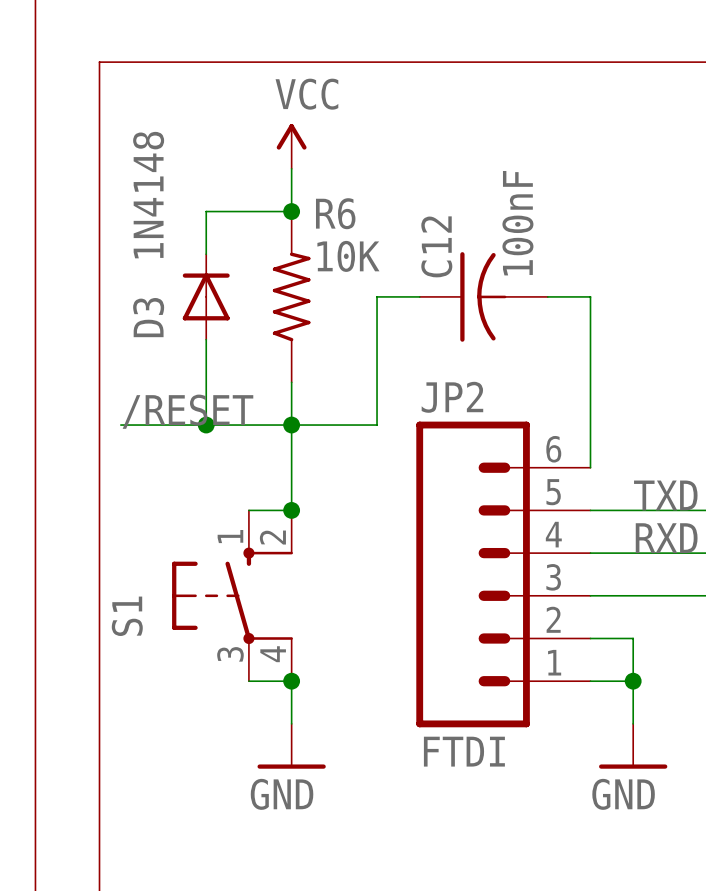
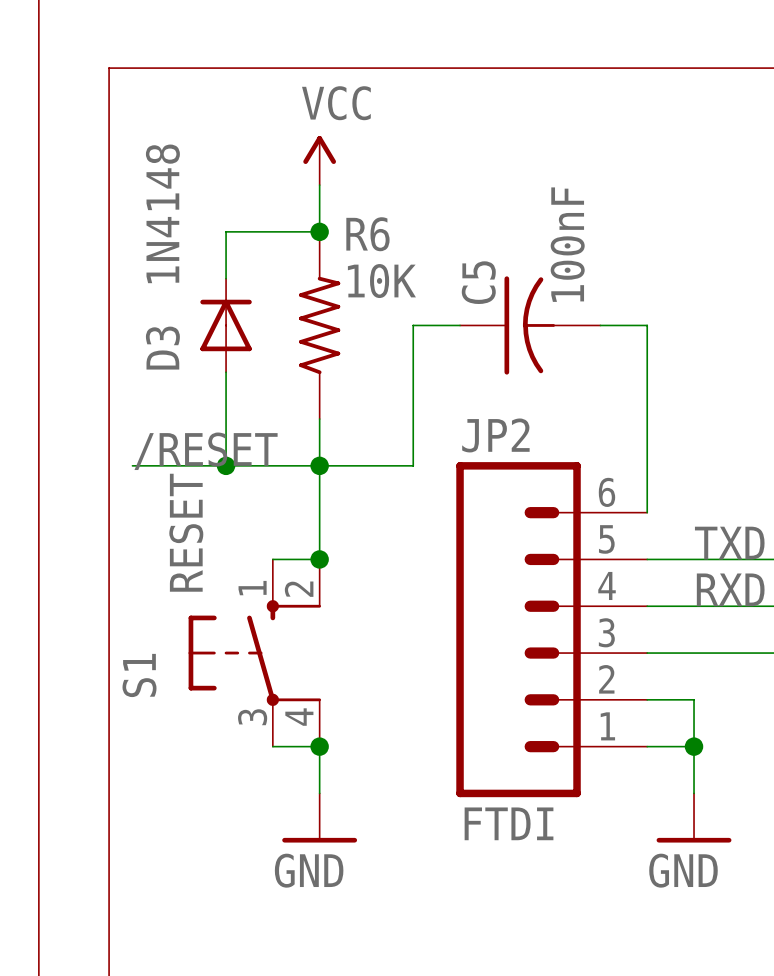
C12 name: C12 (436, 246) -> C5 (478, 282)
S1 value: none -> RESET (186, 532)

